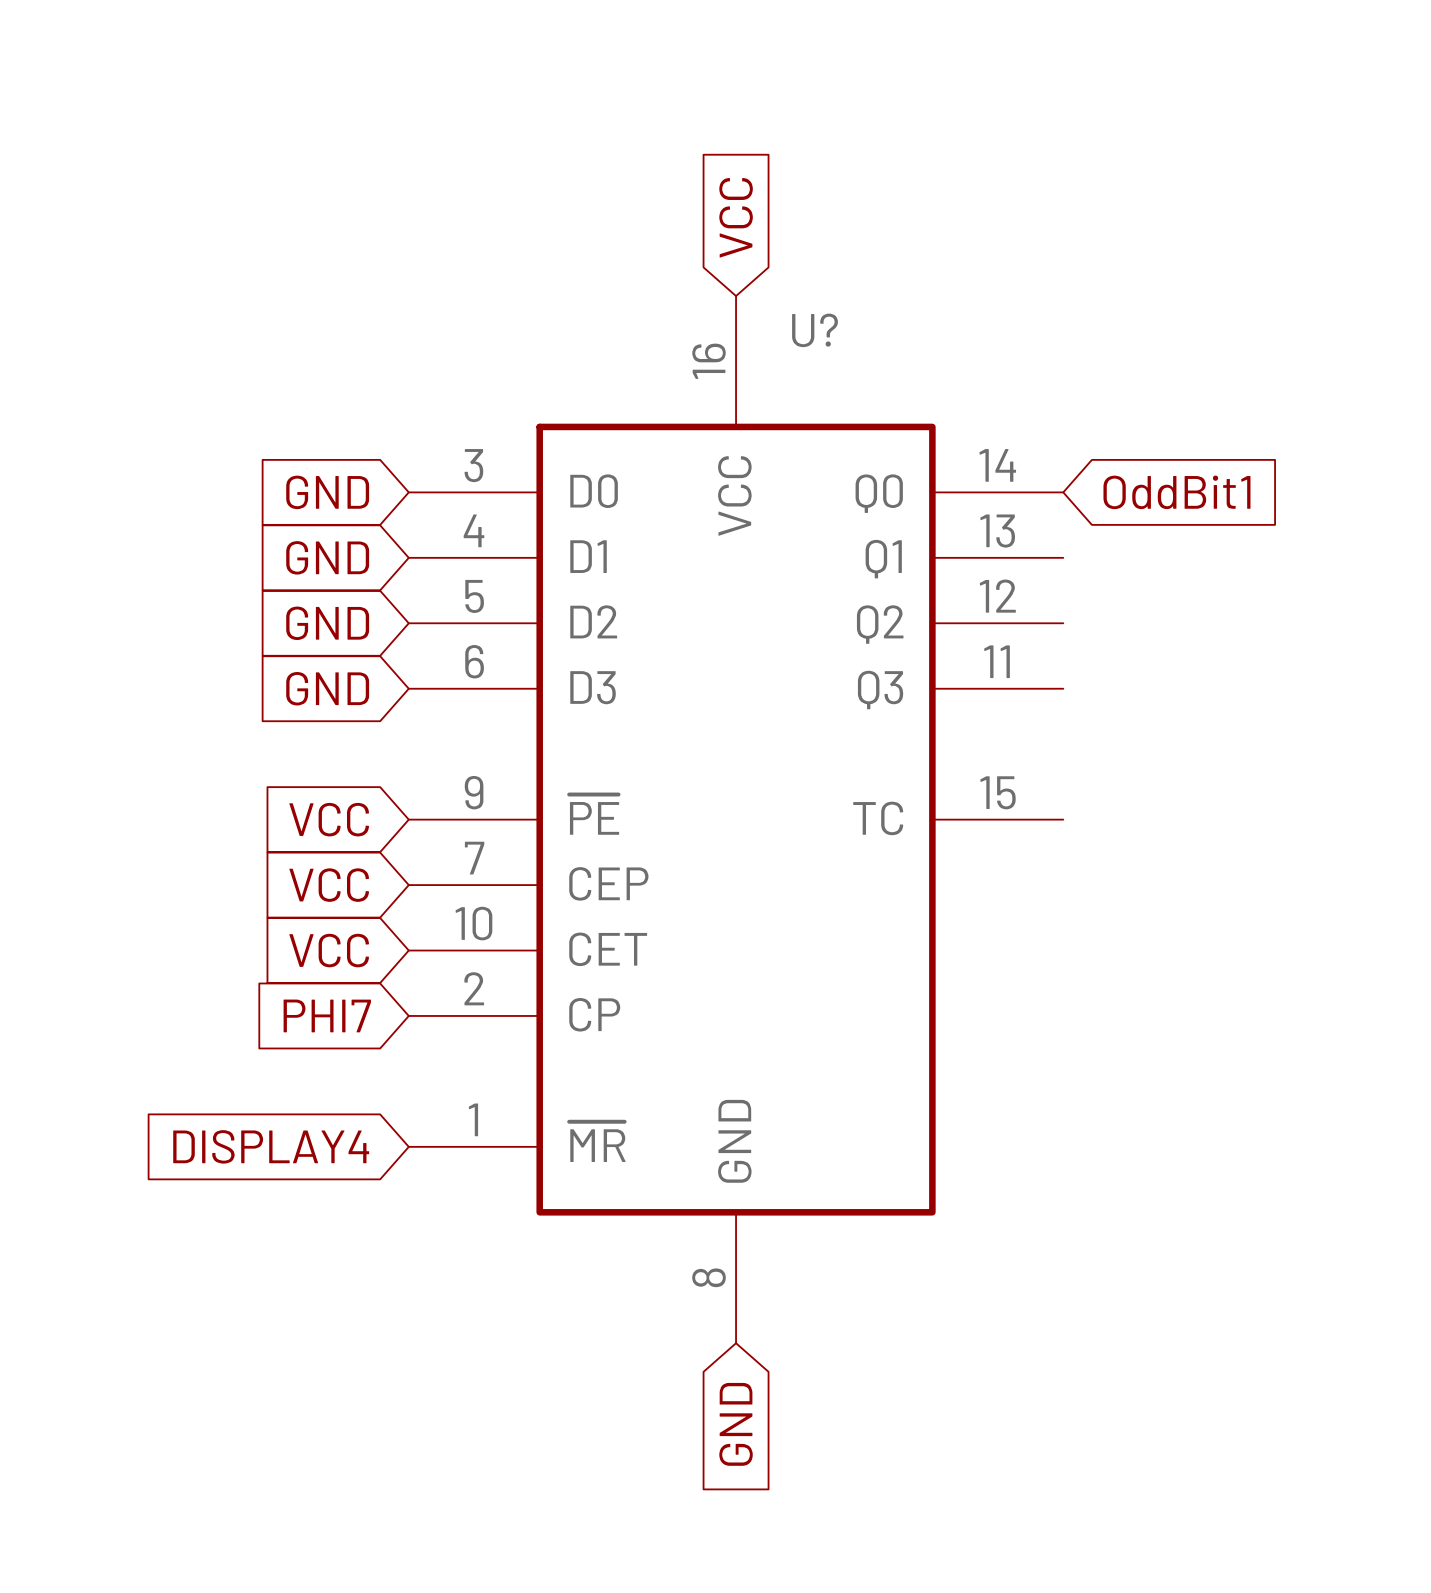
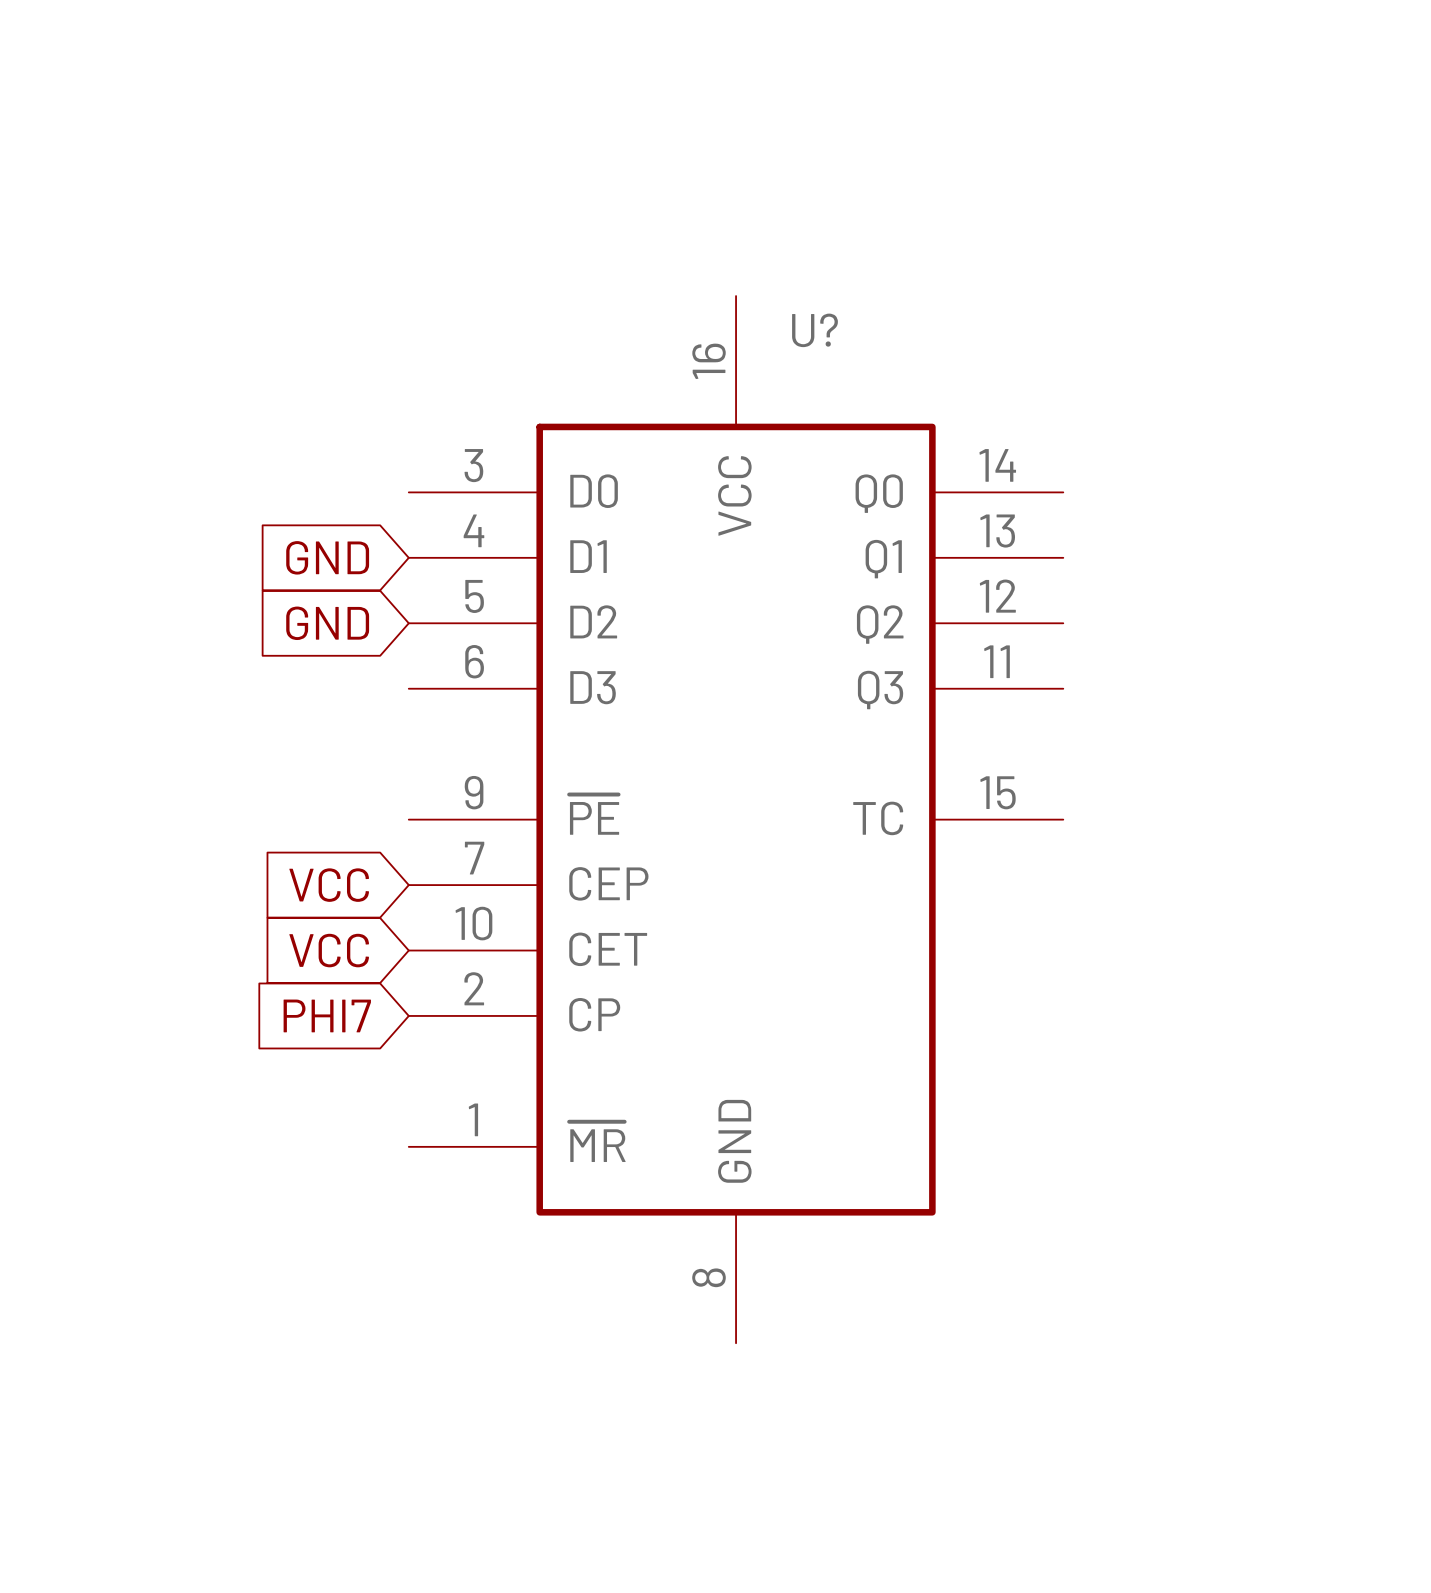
global label: VCC (736, 217) -> none
global label: GND (327, 492) -> none
global label: OddBit1 (1176, 492) -> none
global label: GND (327, 688) -> none
global label: VCC (329, 819) -> none
global label: DISPLAY4 (271, 1146) -> none
global label: GND (736, 1424) -> none

